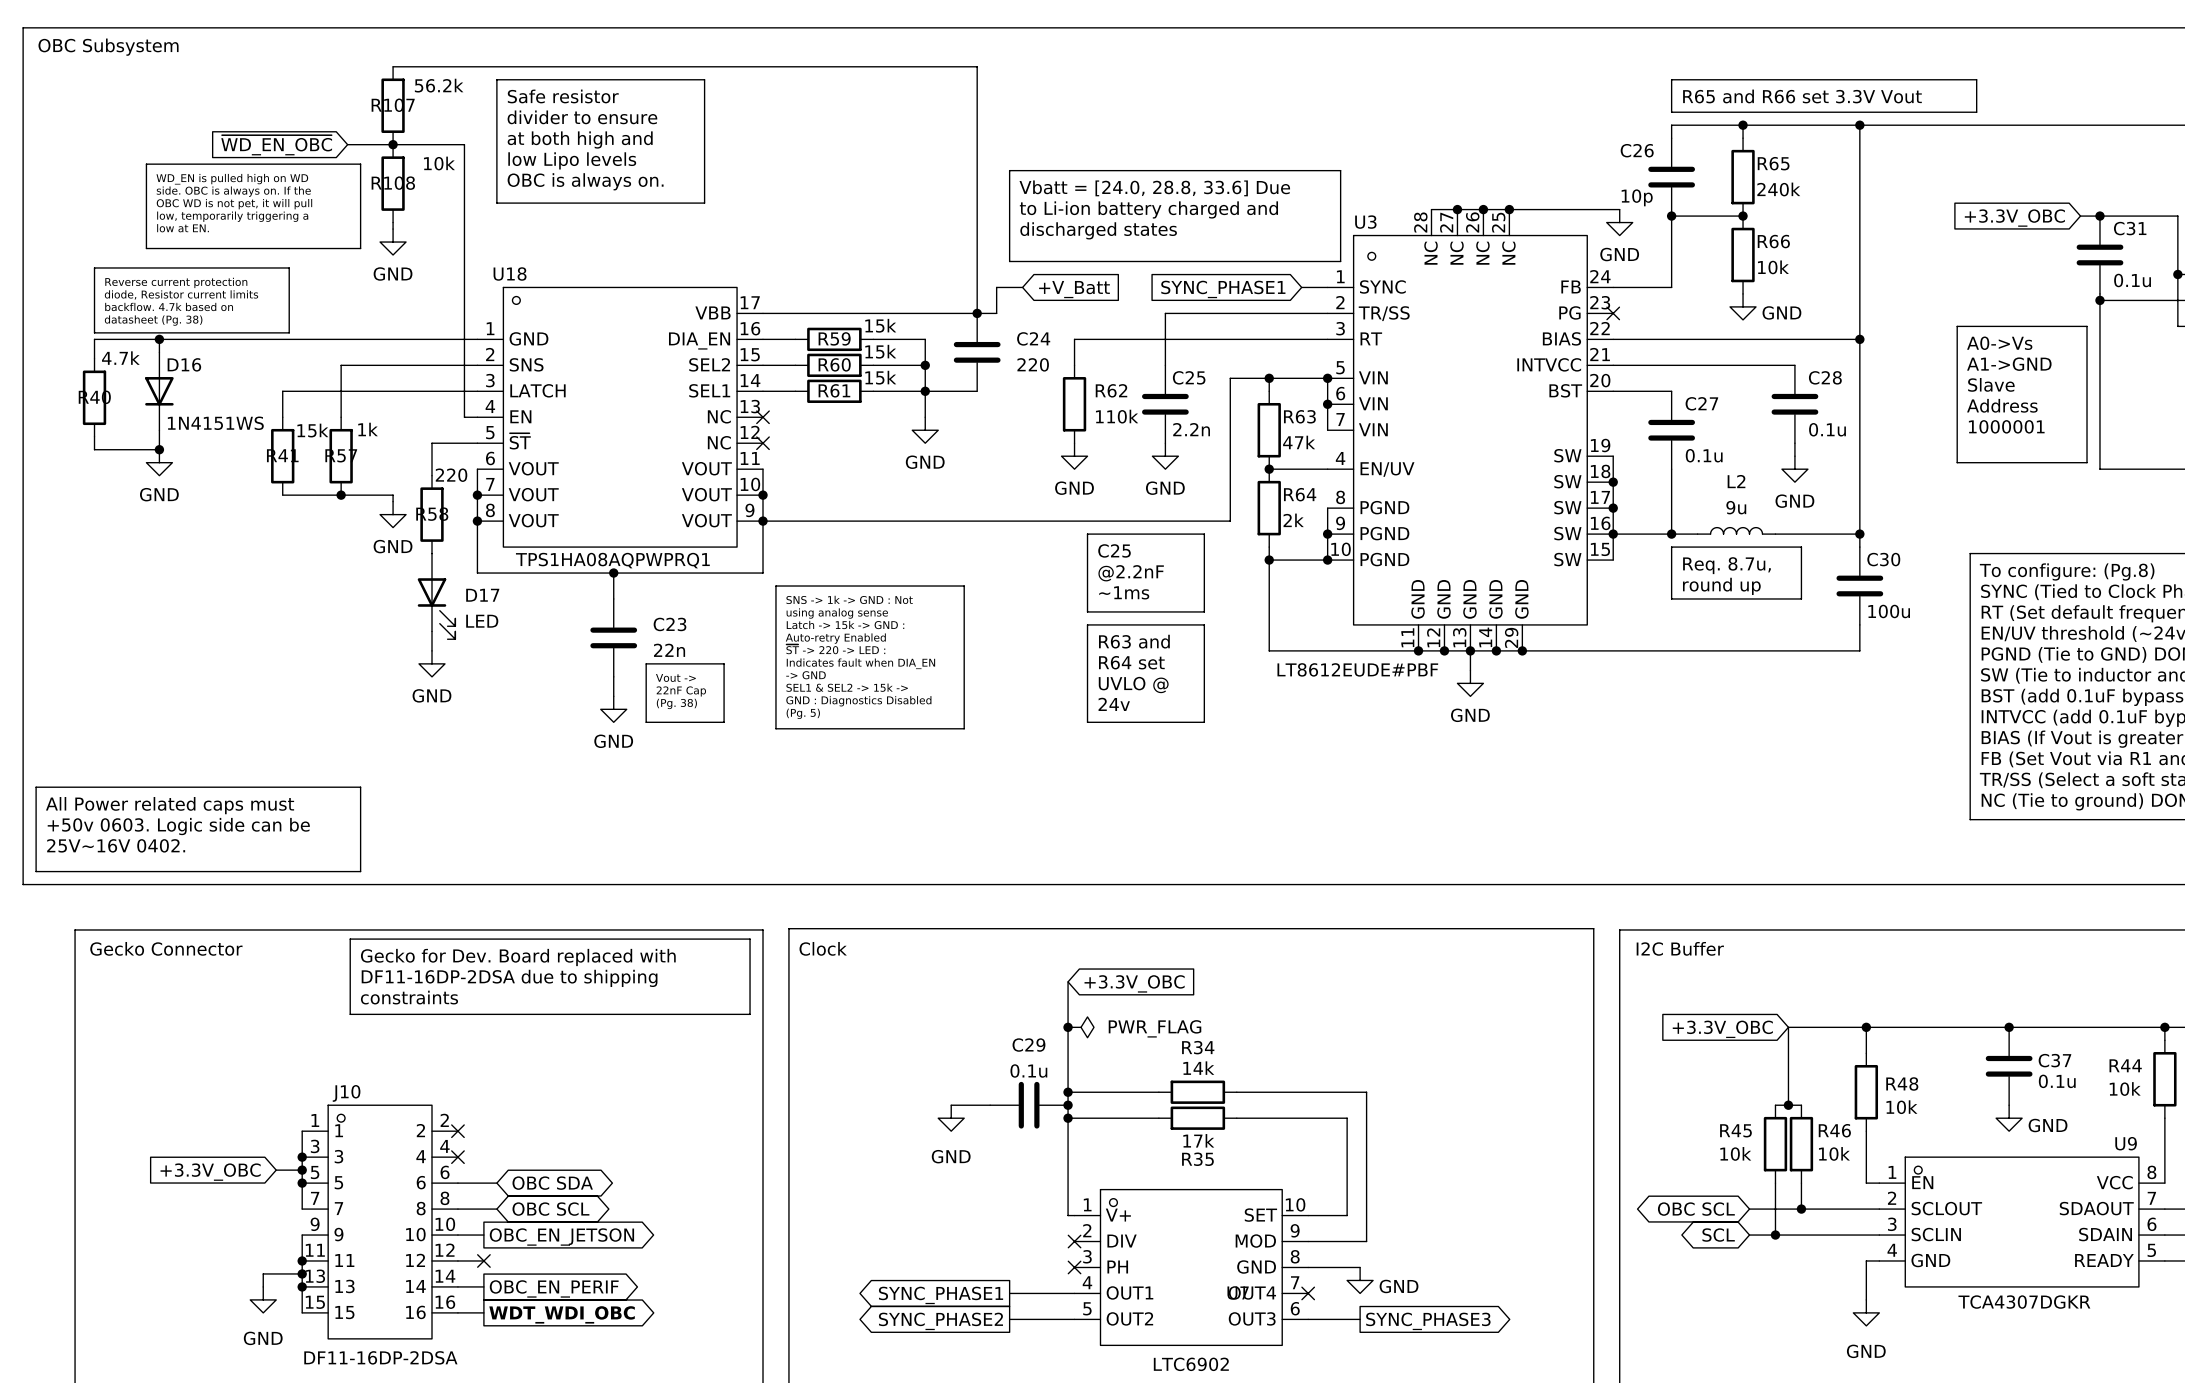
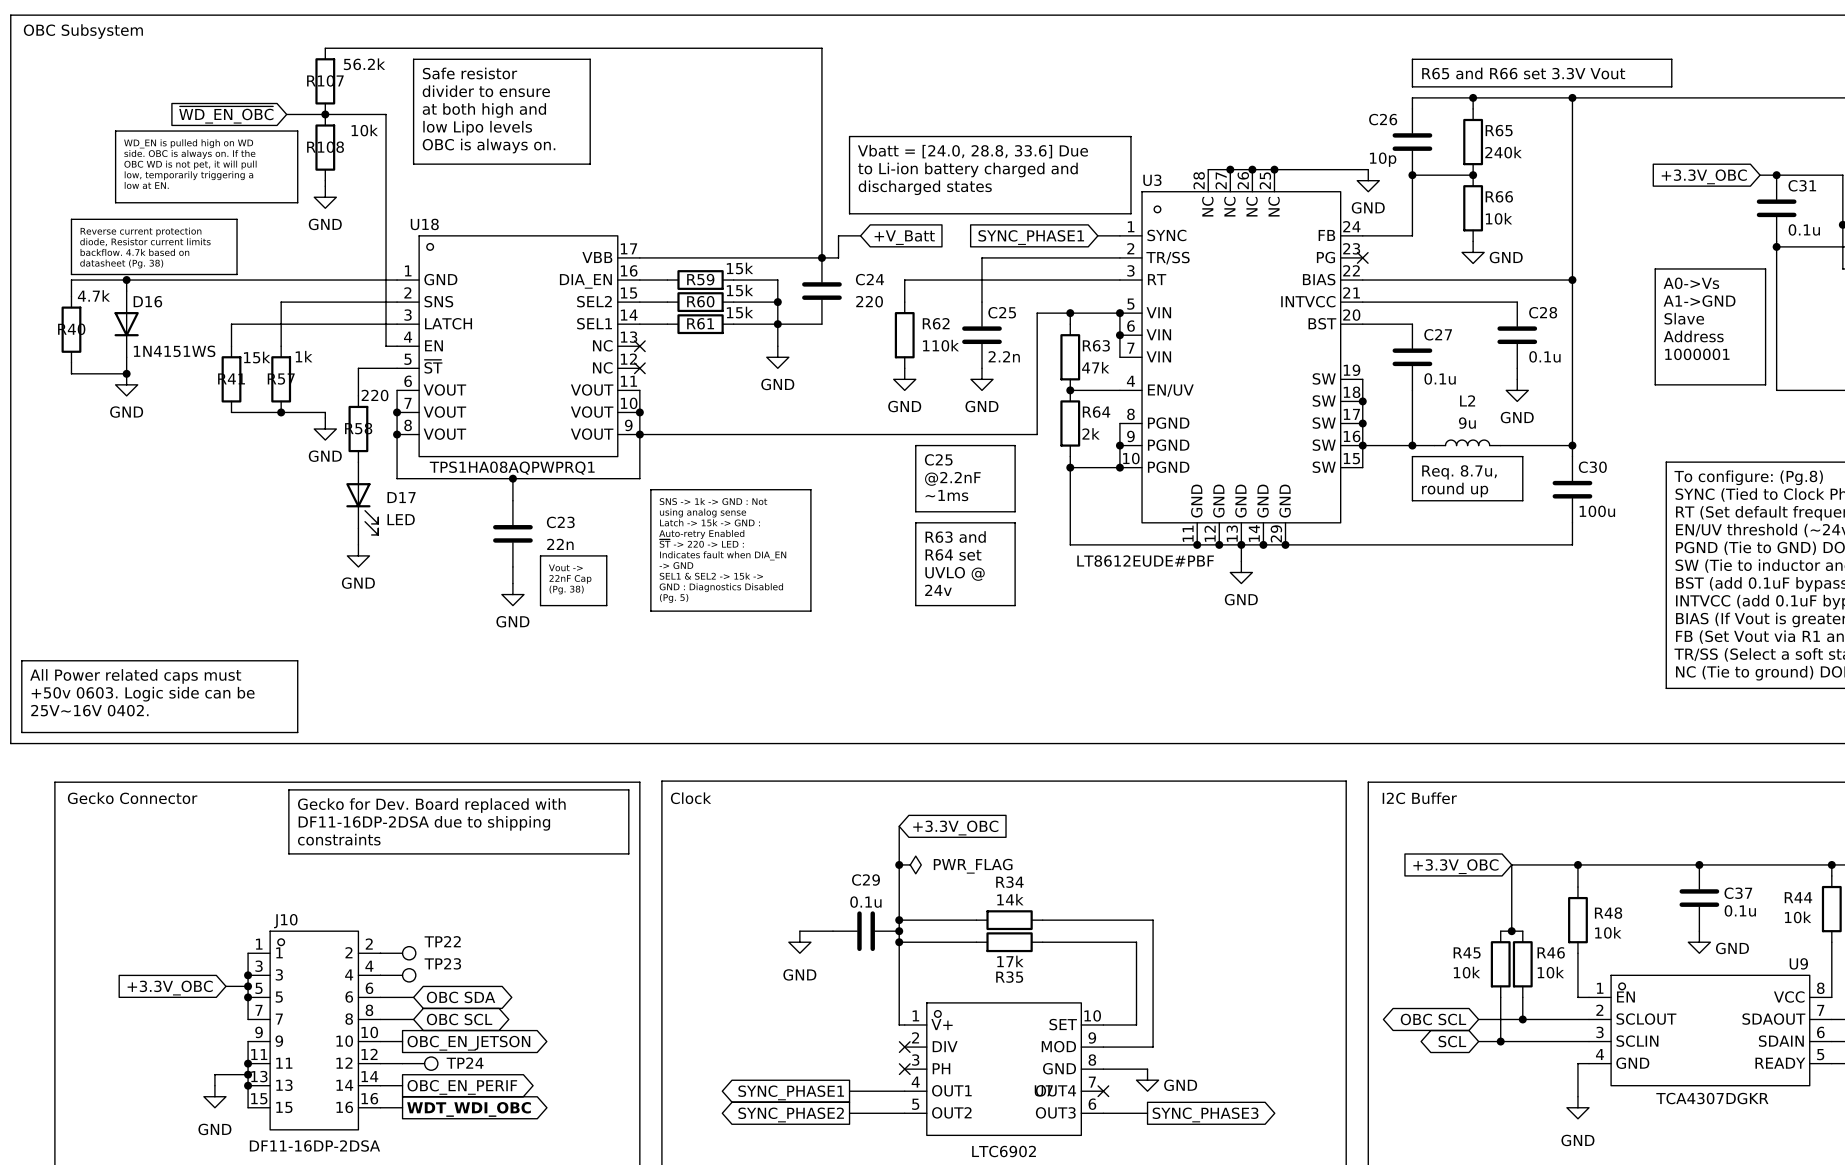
no-connect mark: (457, 1131) -> none
TP22: none -> (398, 953)
no-connect mark: (457, 1157) -> none
TP23: none -> (398, 975)
no-connect mark: (483, 1260) -> none
TP24: none -> (420, 1063)

